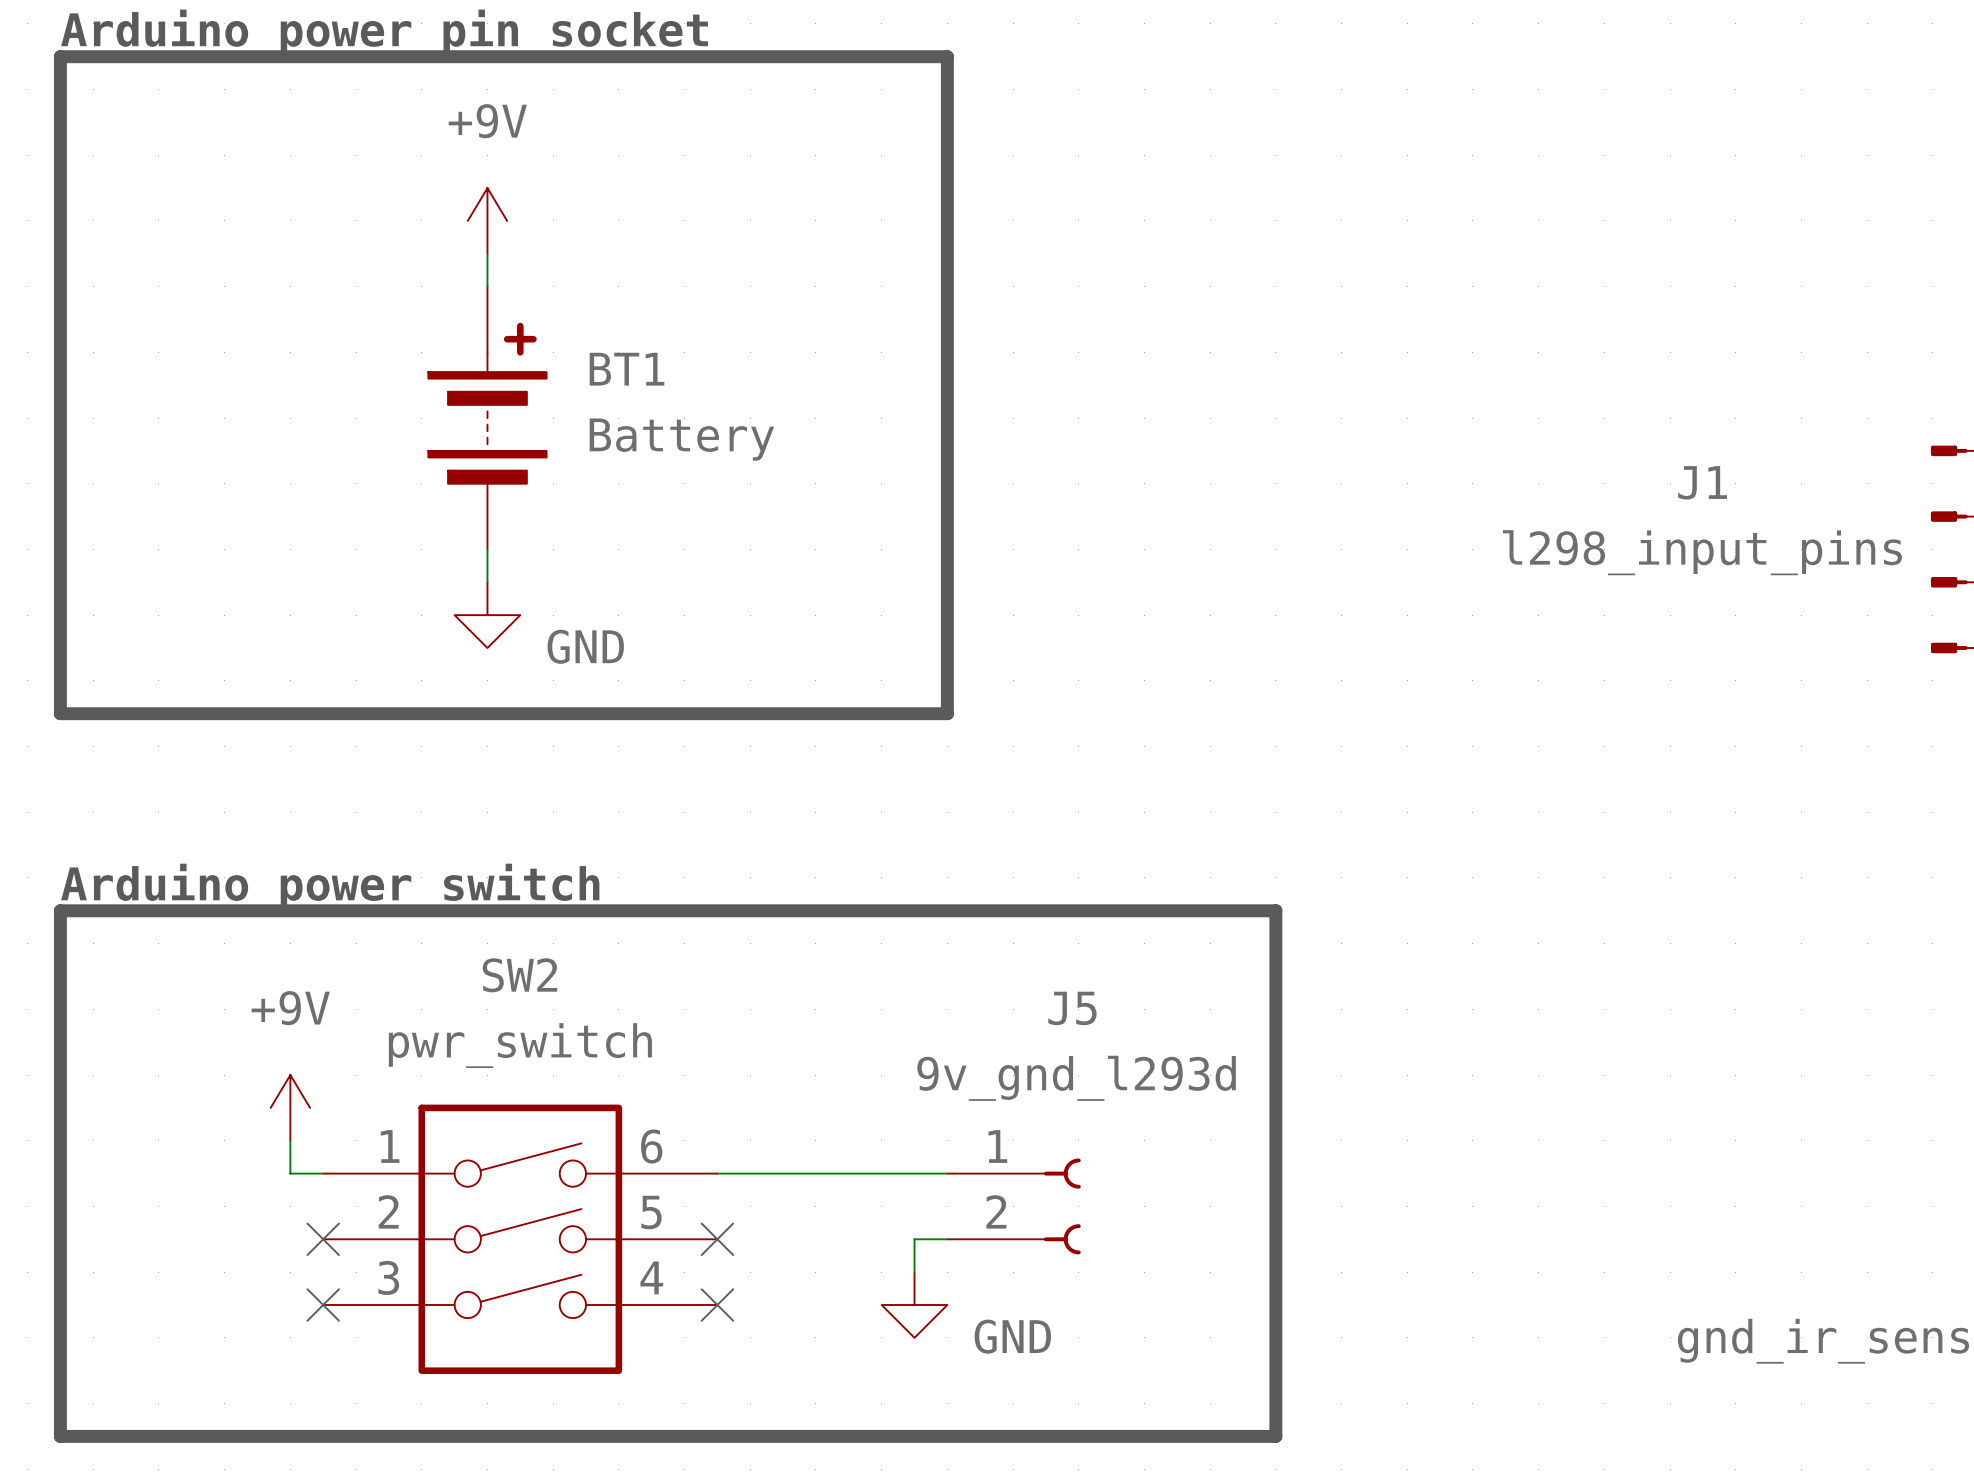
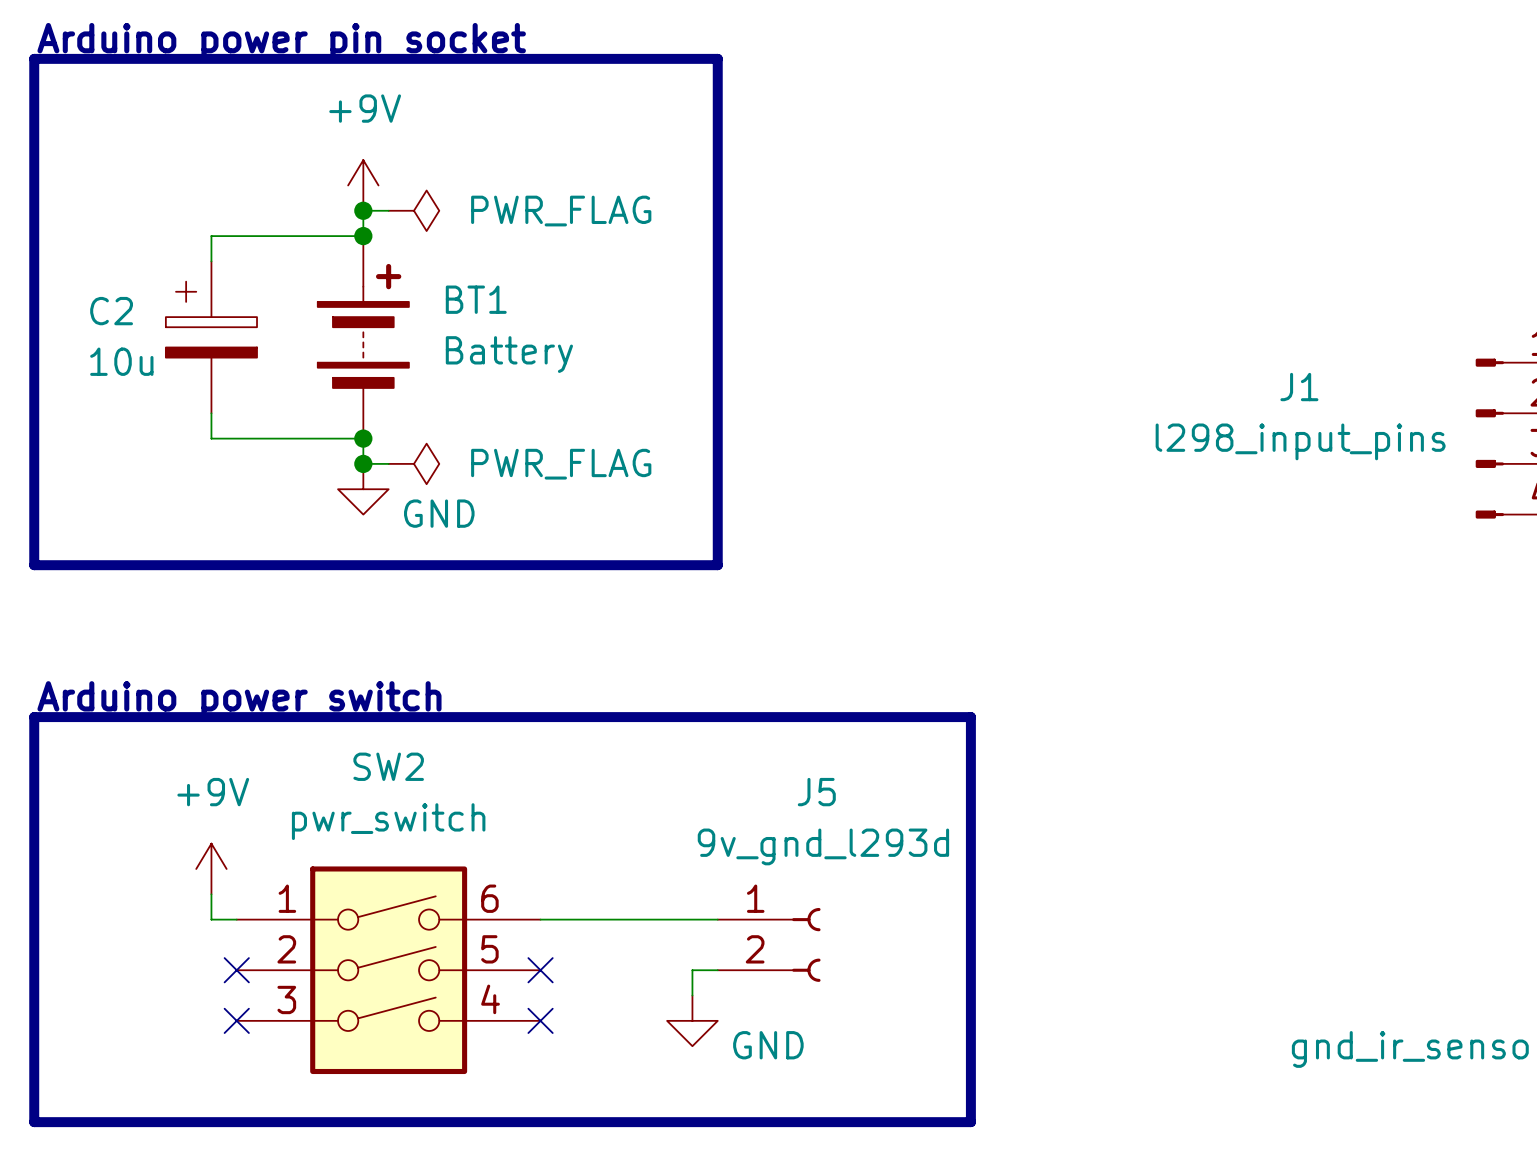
wire: none -> (363, 210) (388, 210)
junction: none -> (363, 210)
power symbol: none -> PWR_FLAG (413, 210)
wire: none -> (363, 236) (211, 236) (211, 261)
junction: none -> (363, 236)
C2: none -> 10u (211, 337)
wire: none -> (211, 413) (211, 438) (363, 438)
junction: none -> (363, 438)
wire: none -> (363, 463) (388, 463)
junction: none -> (363, 463)
power symbol: none -> PWR_FLAG (413, 463)

